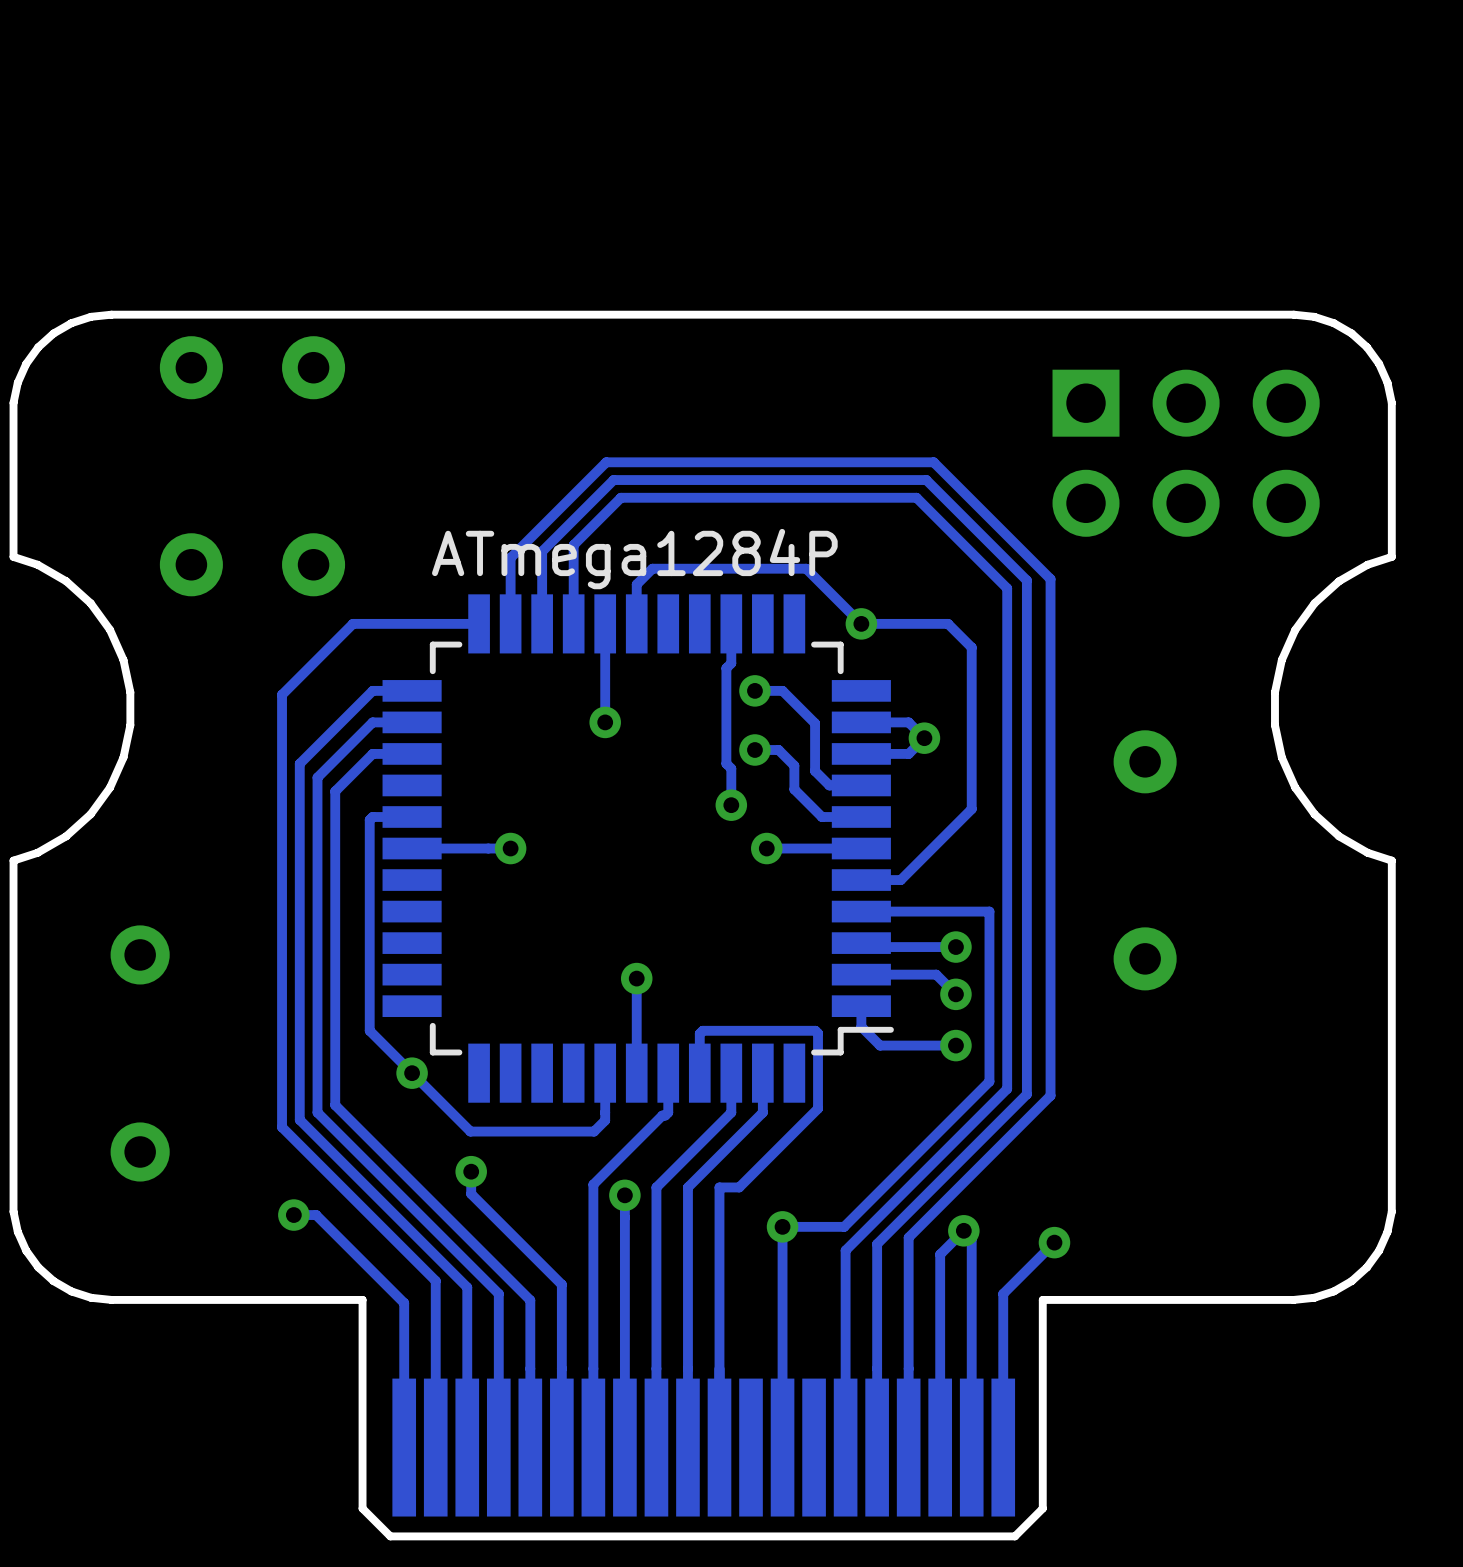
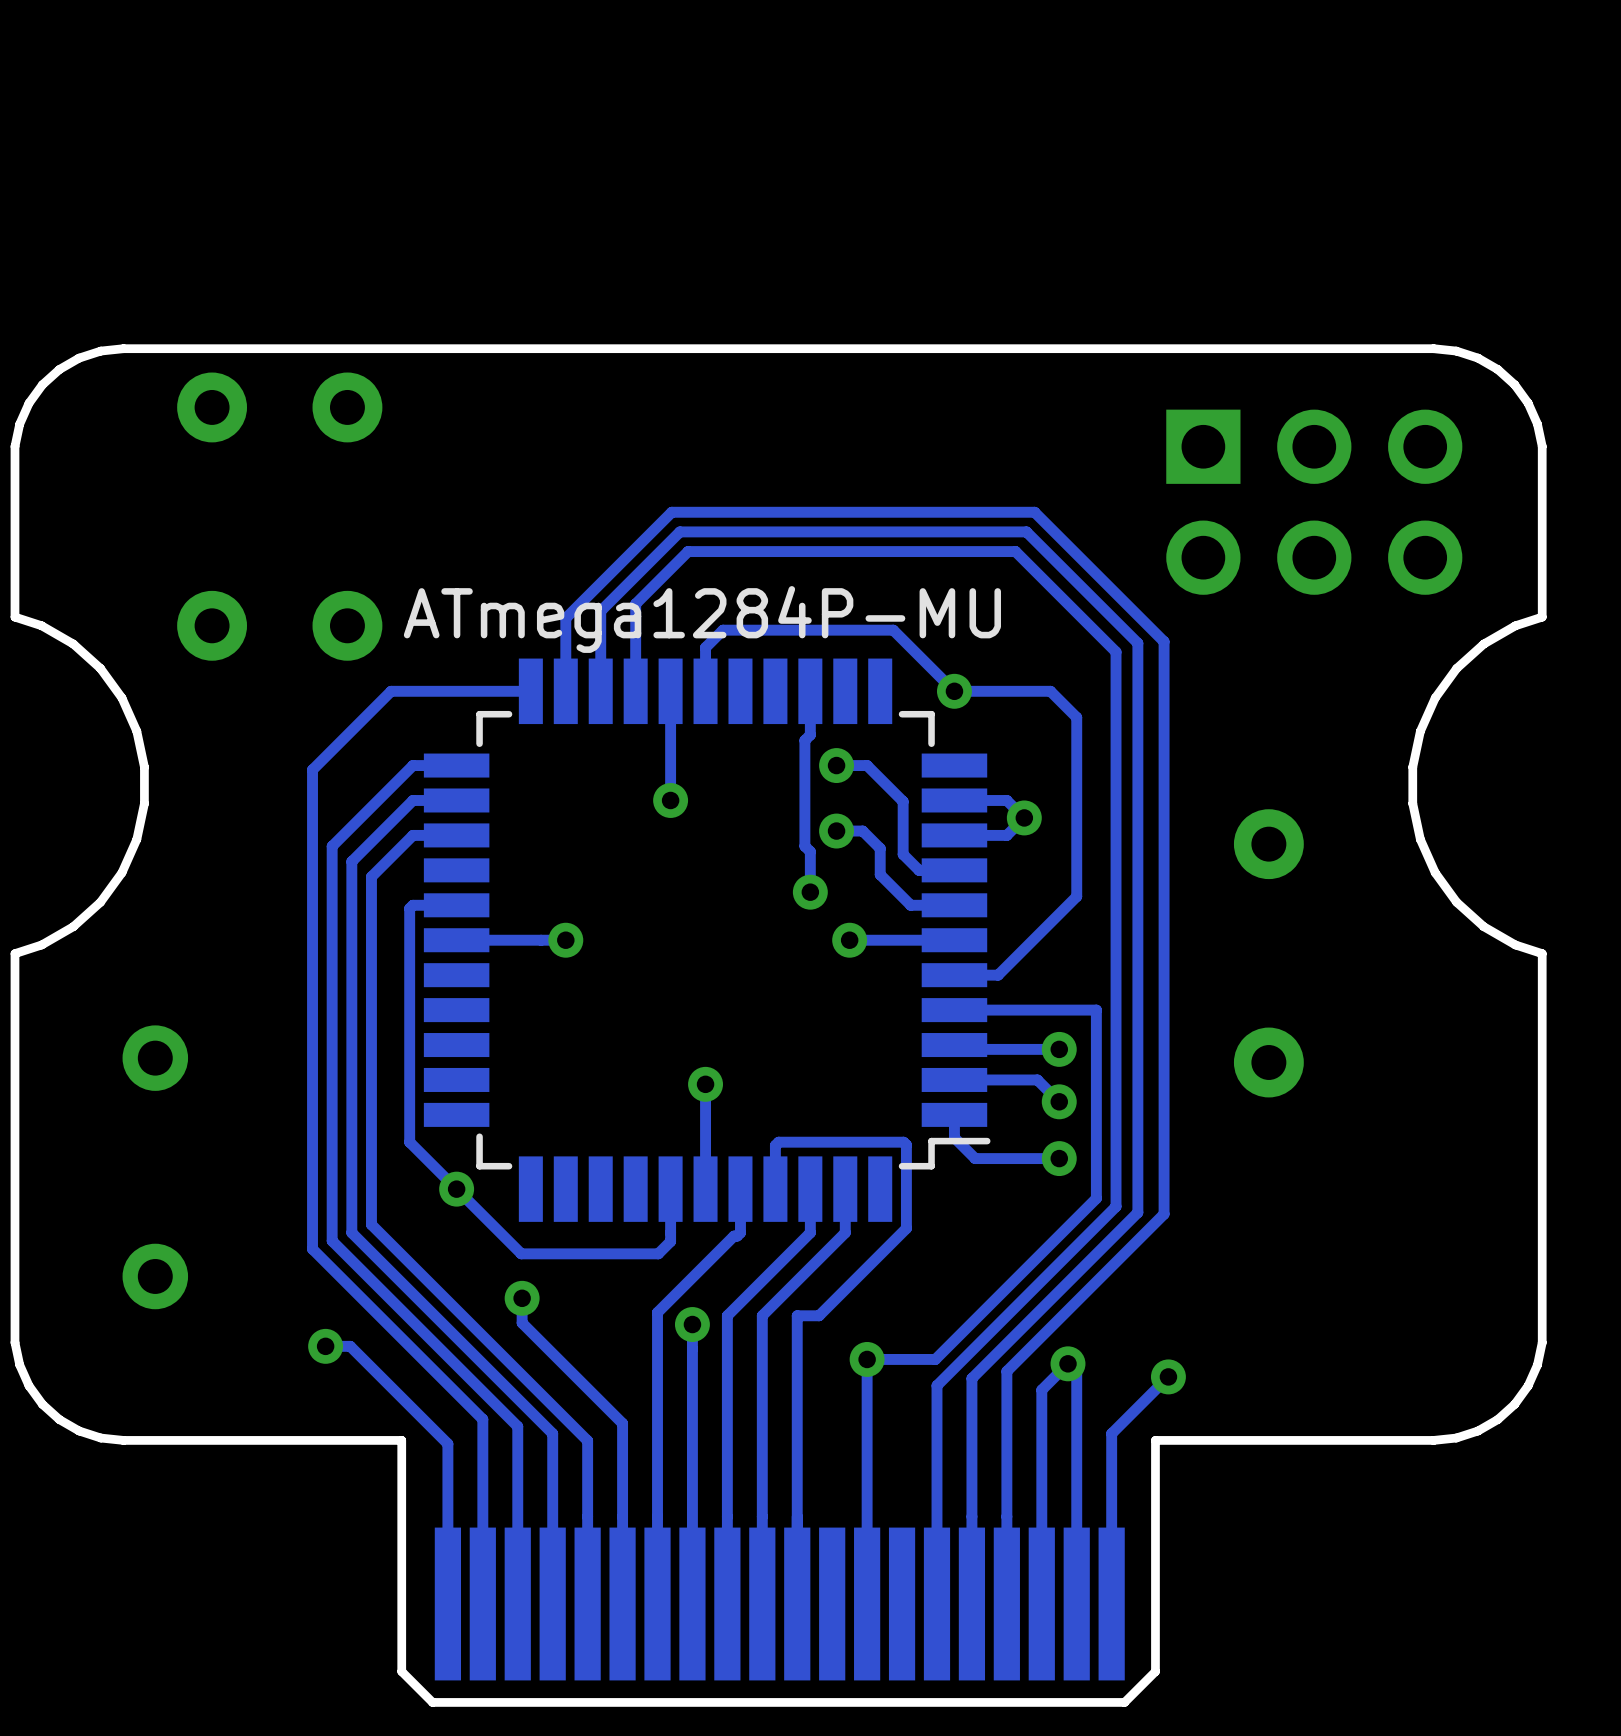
part value: ATmega1284P (634, 559) -> ATmega1284P-MU (702, 619)

